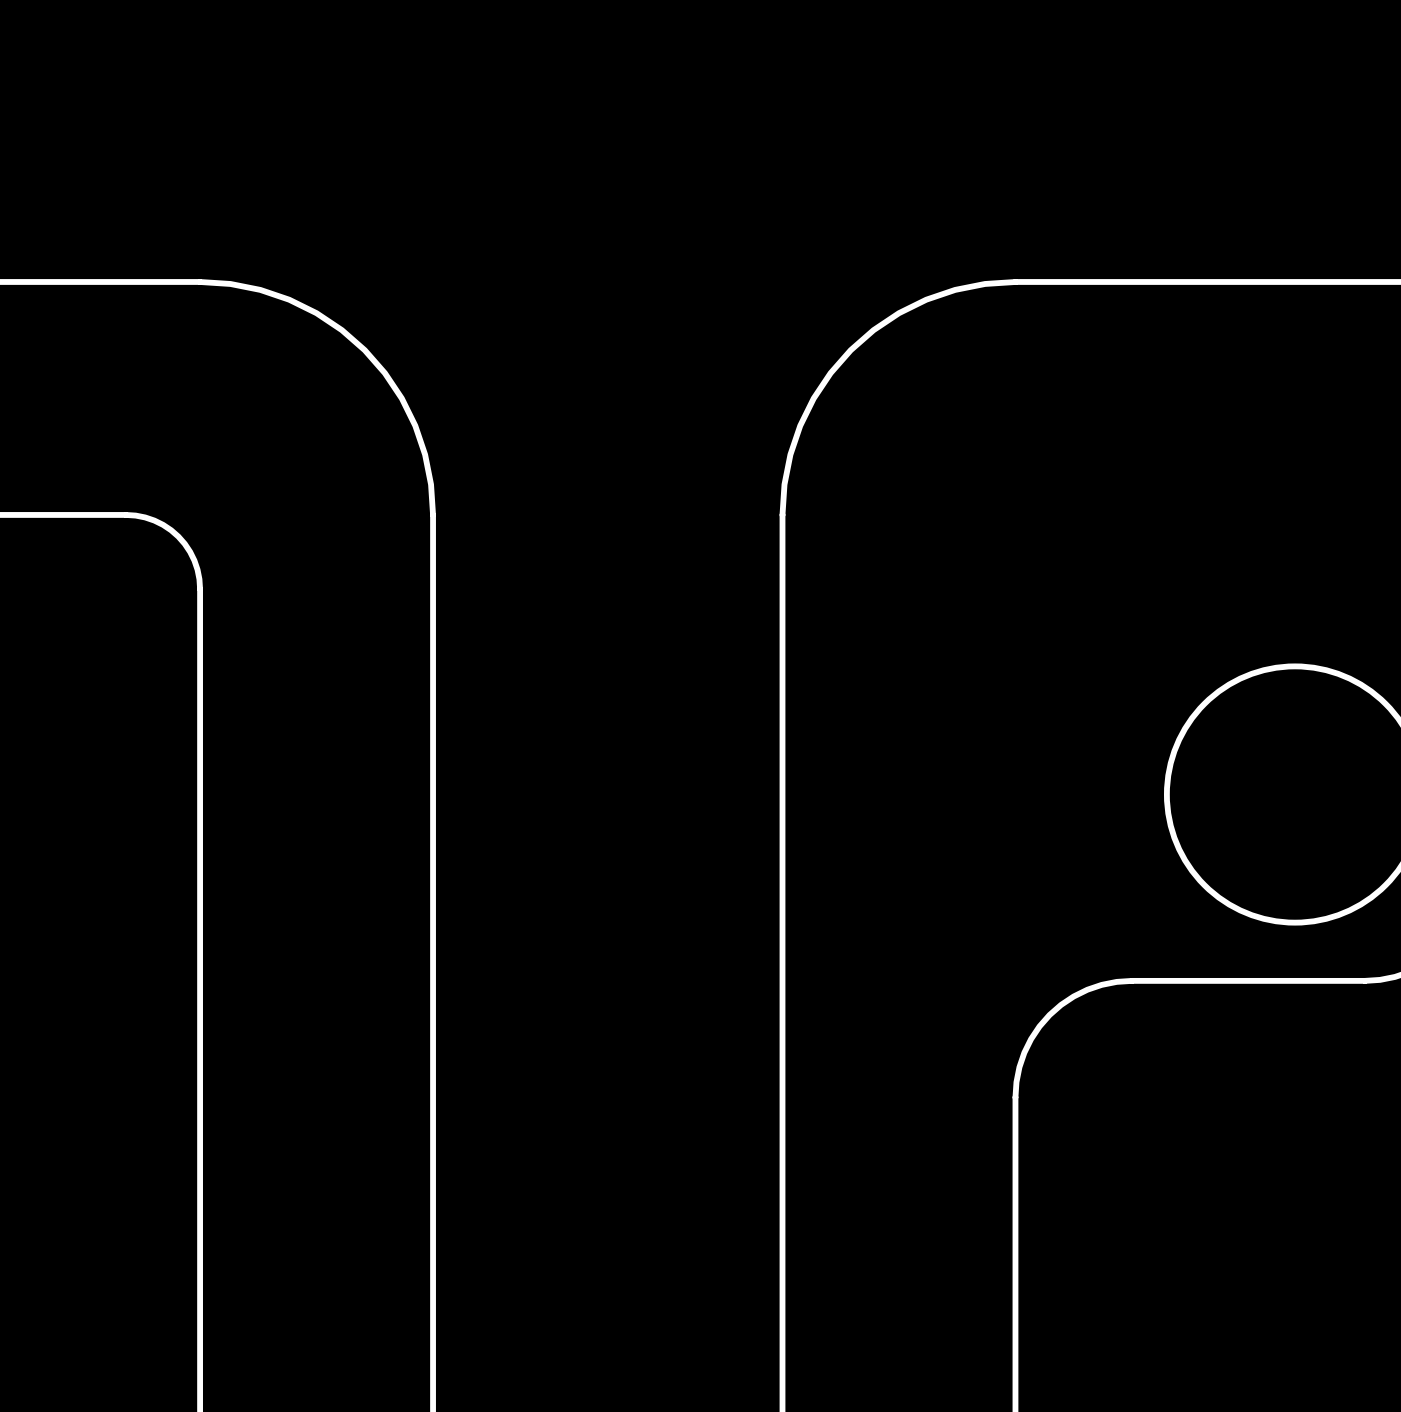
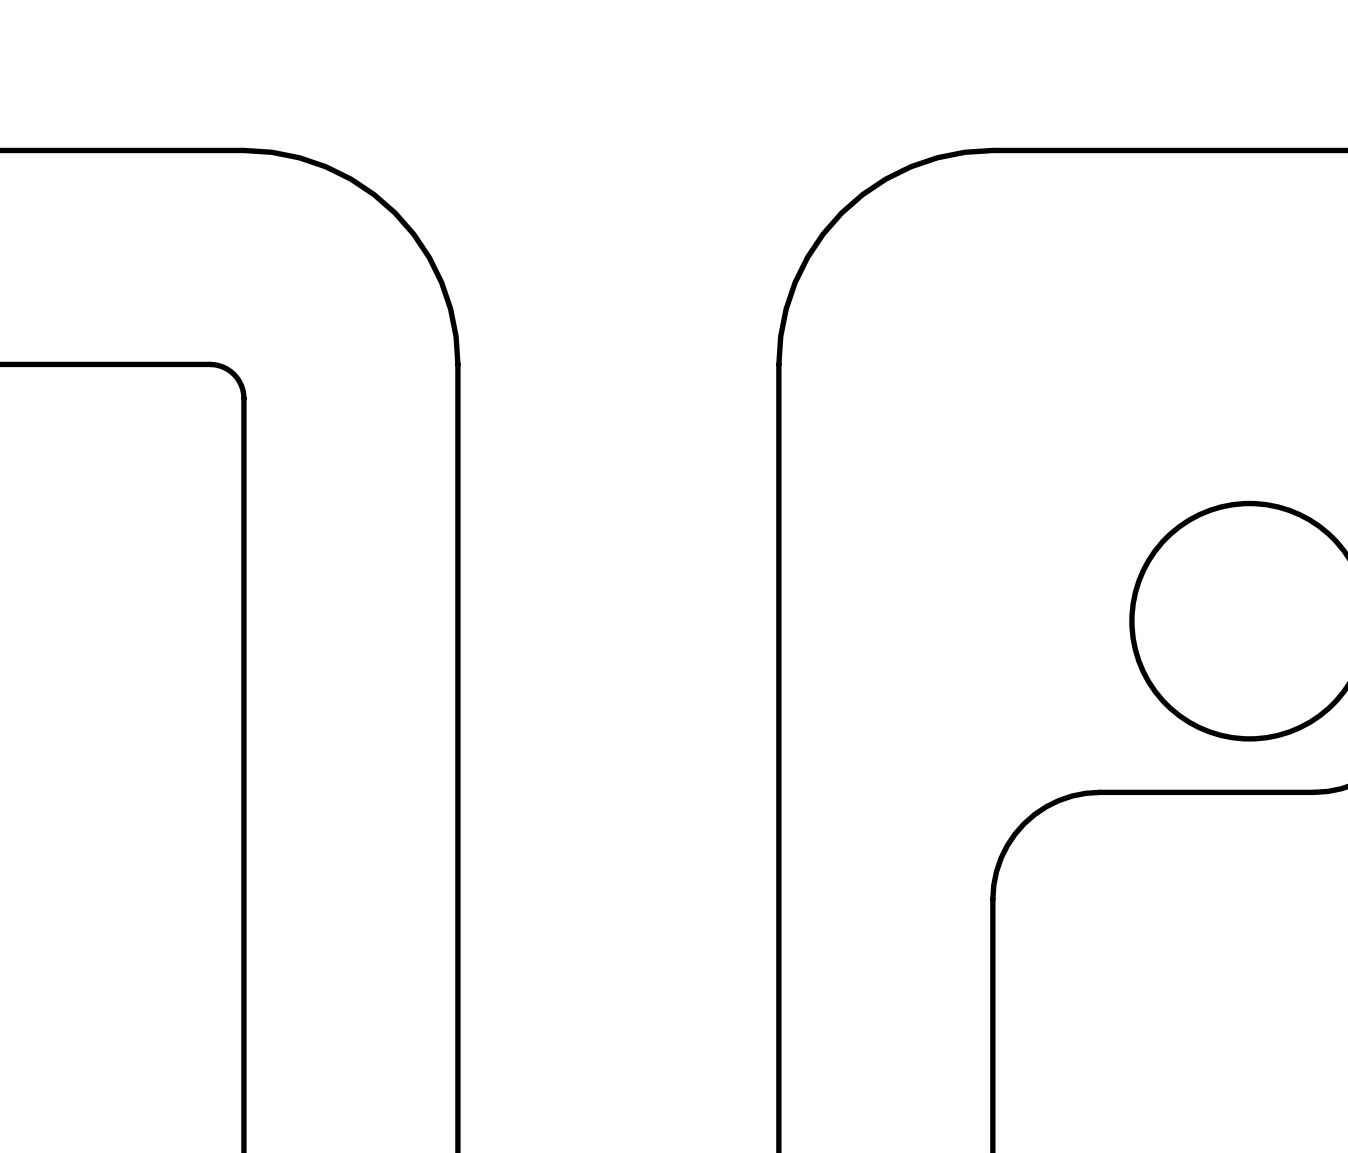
board edge: (126, 514) (154, 520) (178, 536) (194, 560) (200, 588) -> (176, 364) (214, 364) (226, 368) (233, 374) (239, 381) (243, 393) (243, 432)

